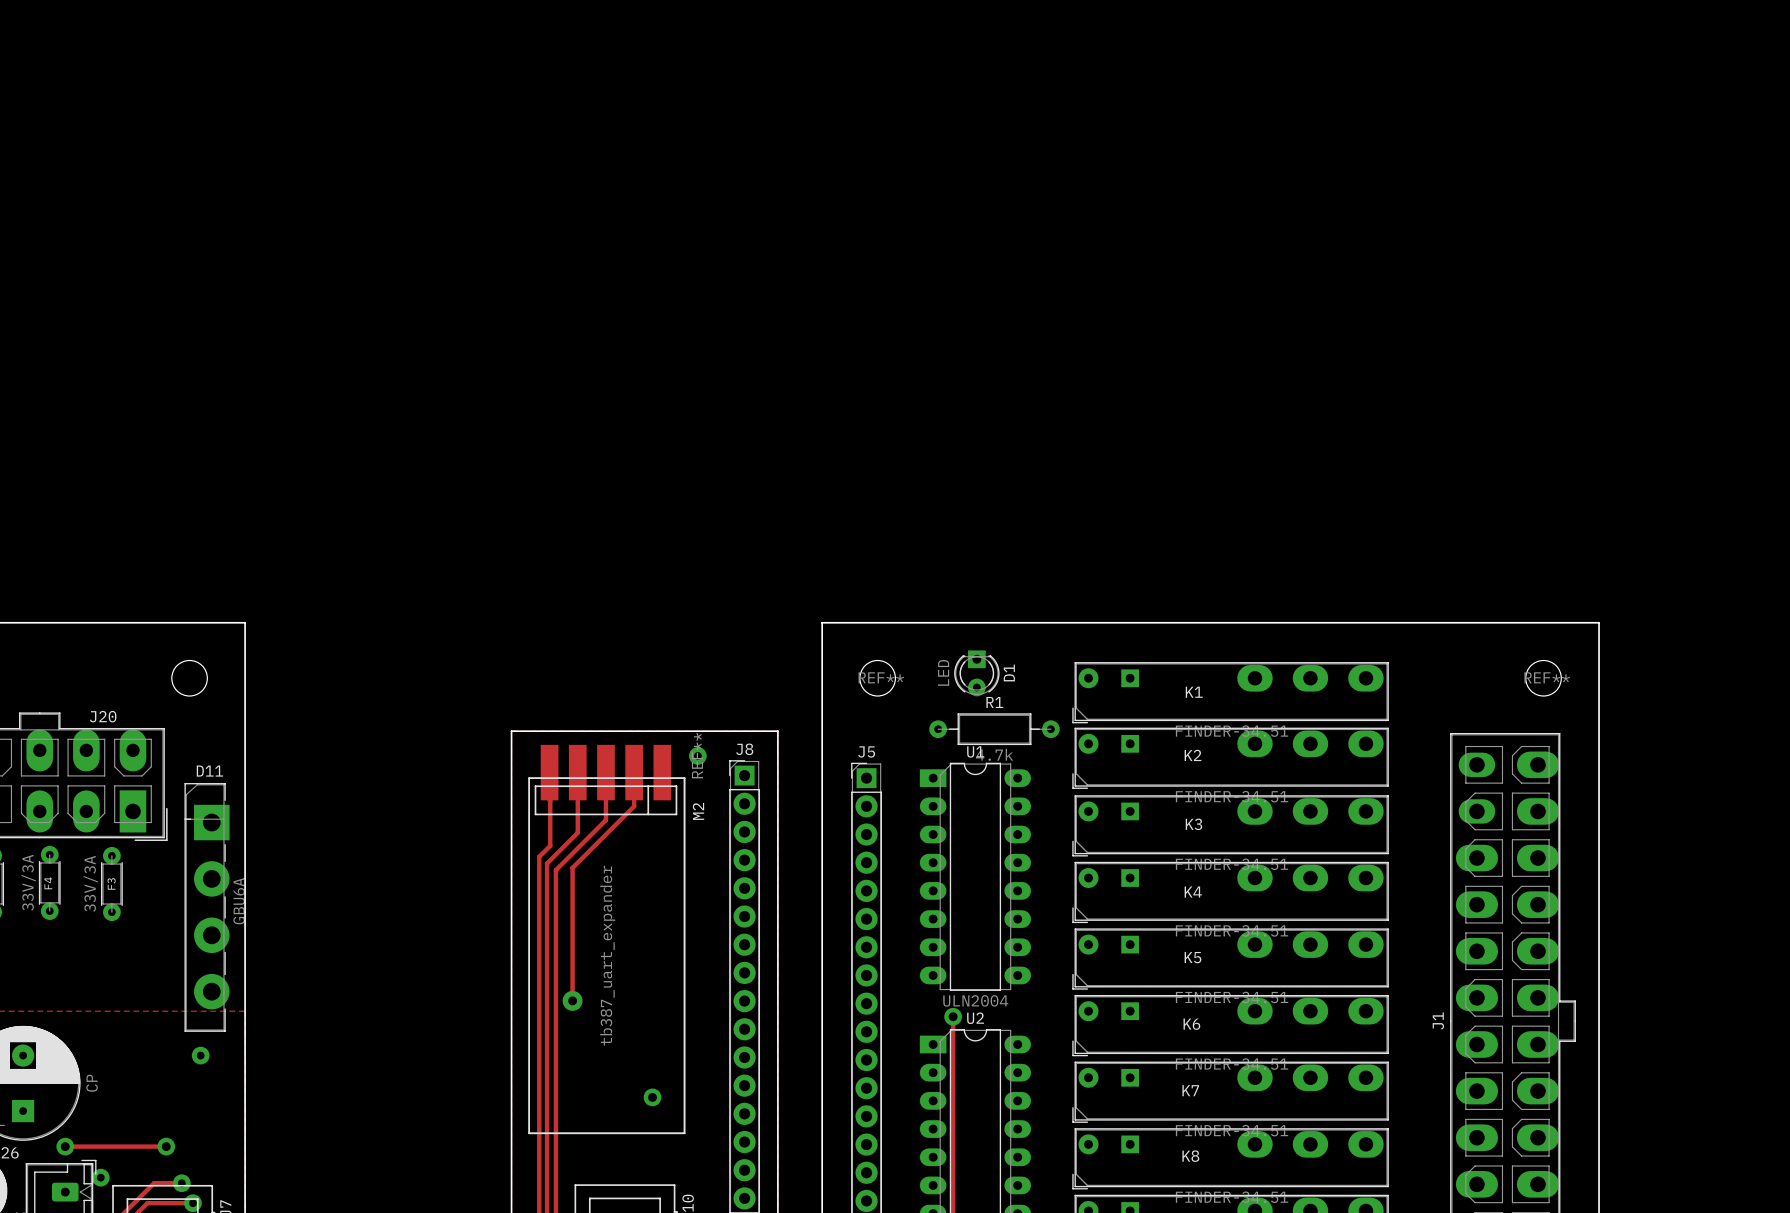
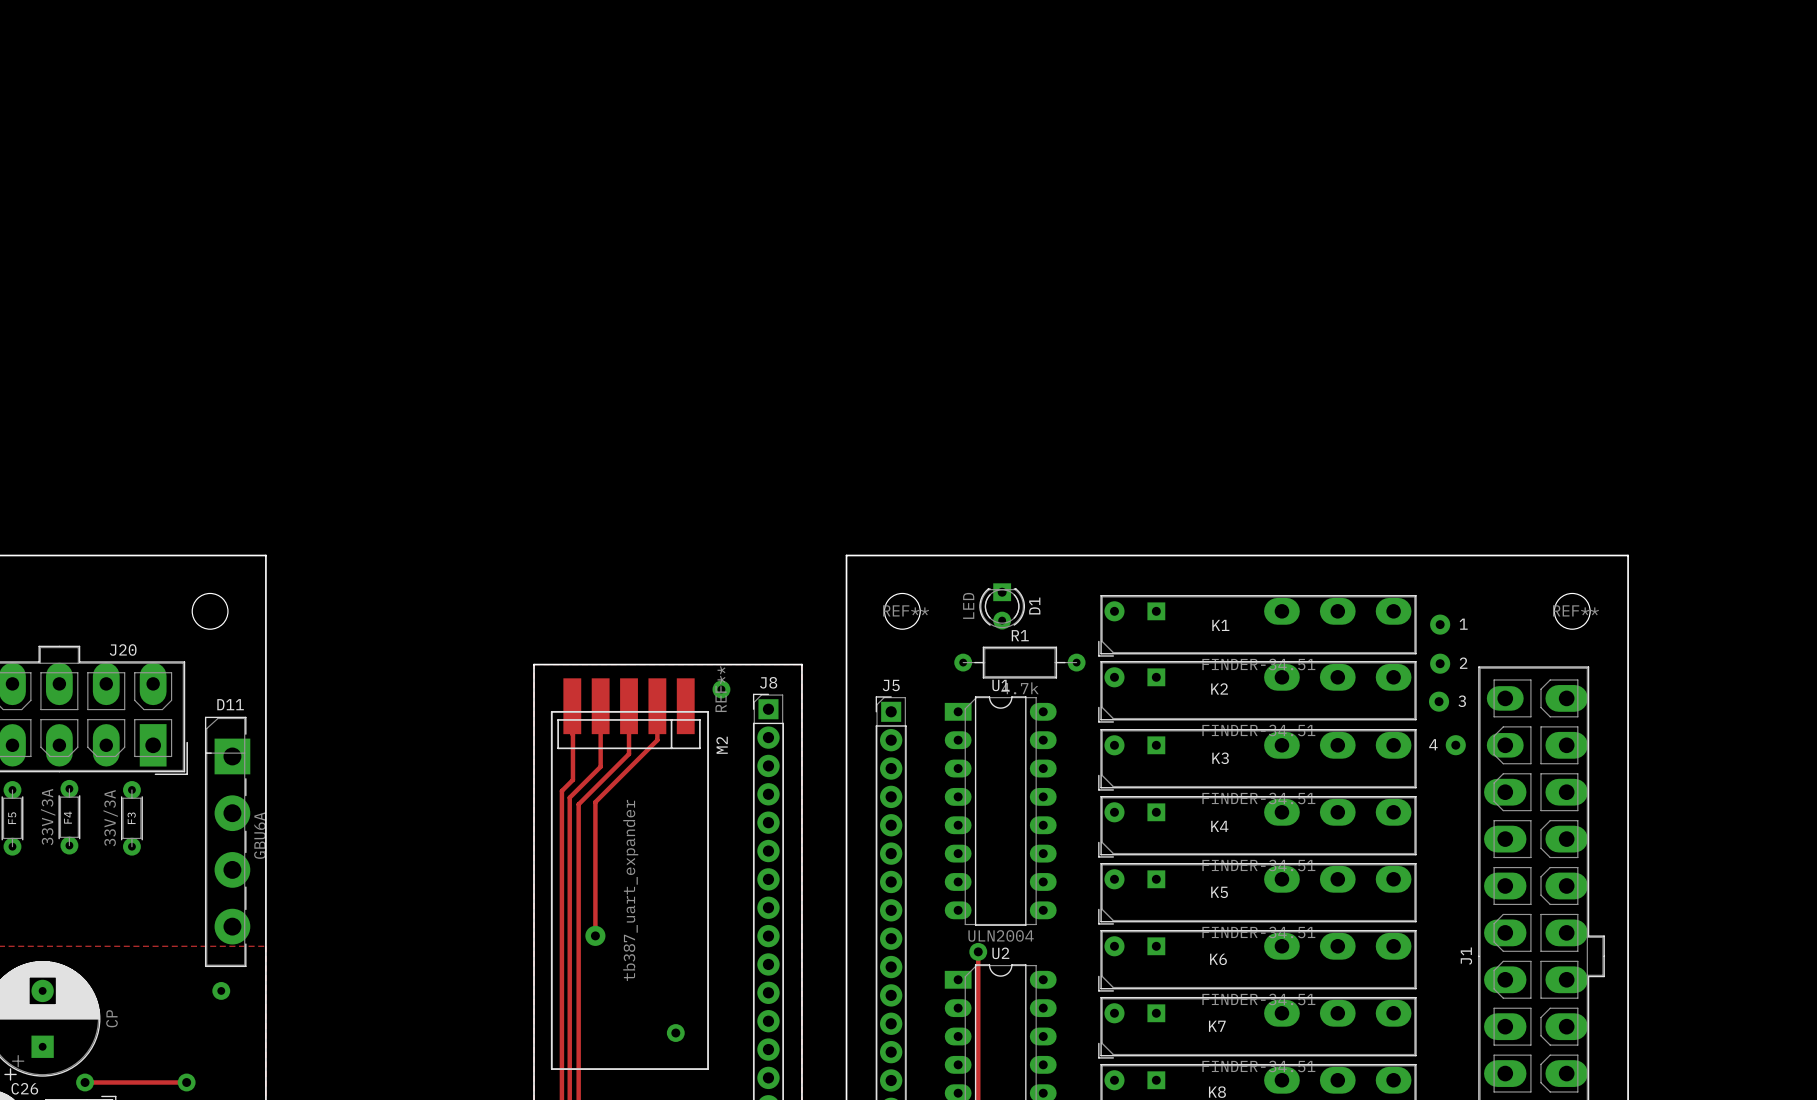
1: none -> (1440, 624)
2: none -> (1440, 663)
3: none -> (1439, 701)
4: none -> (1455, 745)

